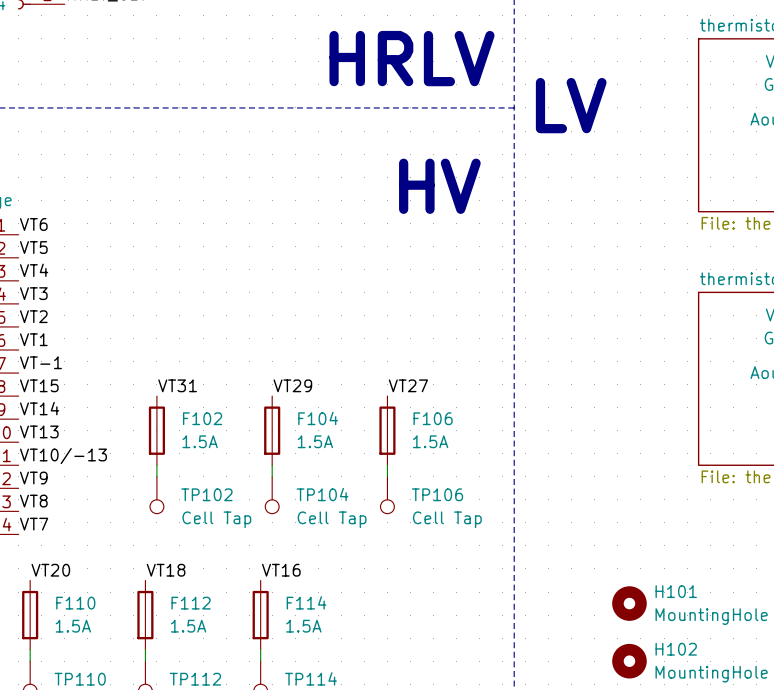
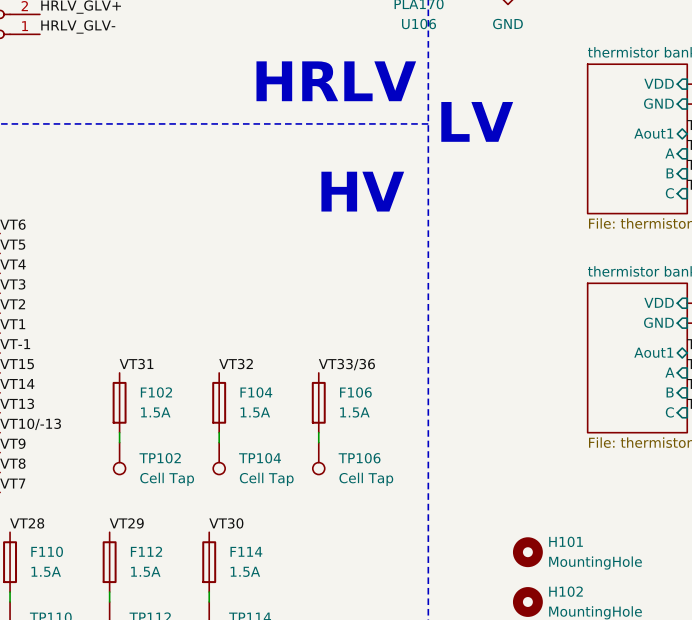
label: VT29 (292, 385) -> VT32 (236, 364)
label: VT27 (408, 385) -> VT33/36 (346, 364)
label: VT20 (50, 570) -> VT28 (27, 523)
label: VT18 (166, 570) -> VT29 (126, 523)
label: VT16 (281, 570) -> VT30 (226, 523)

